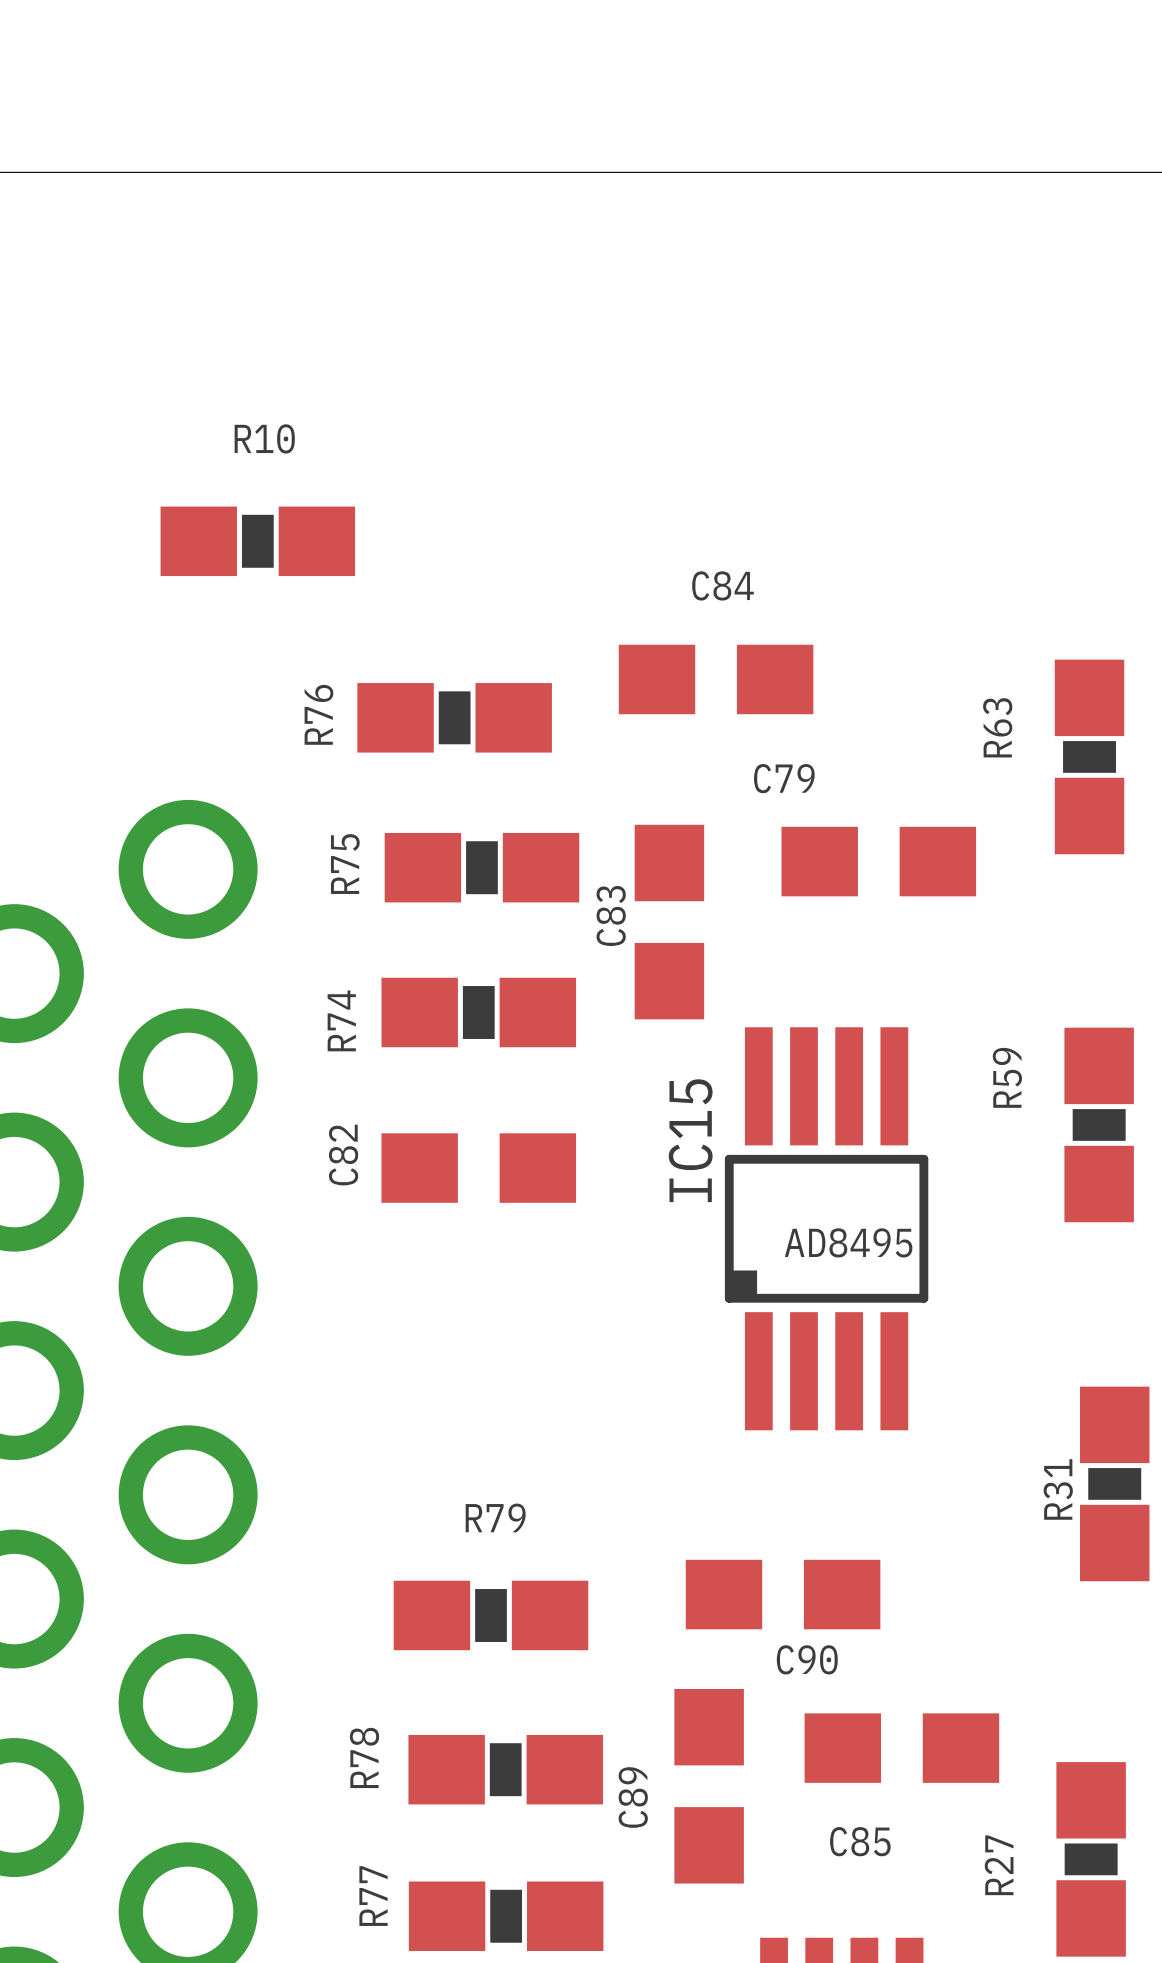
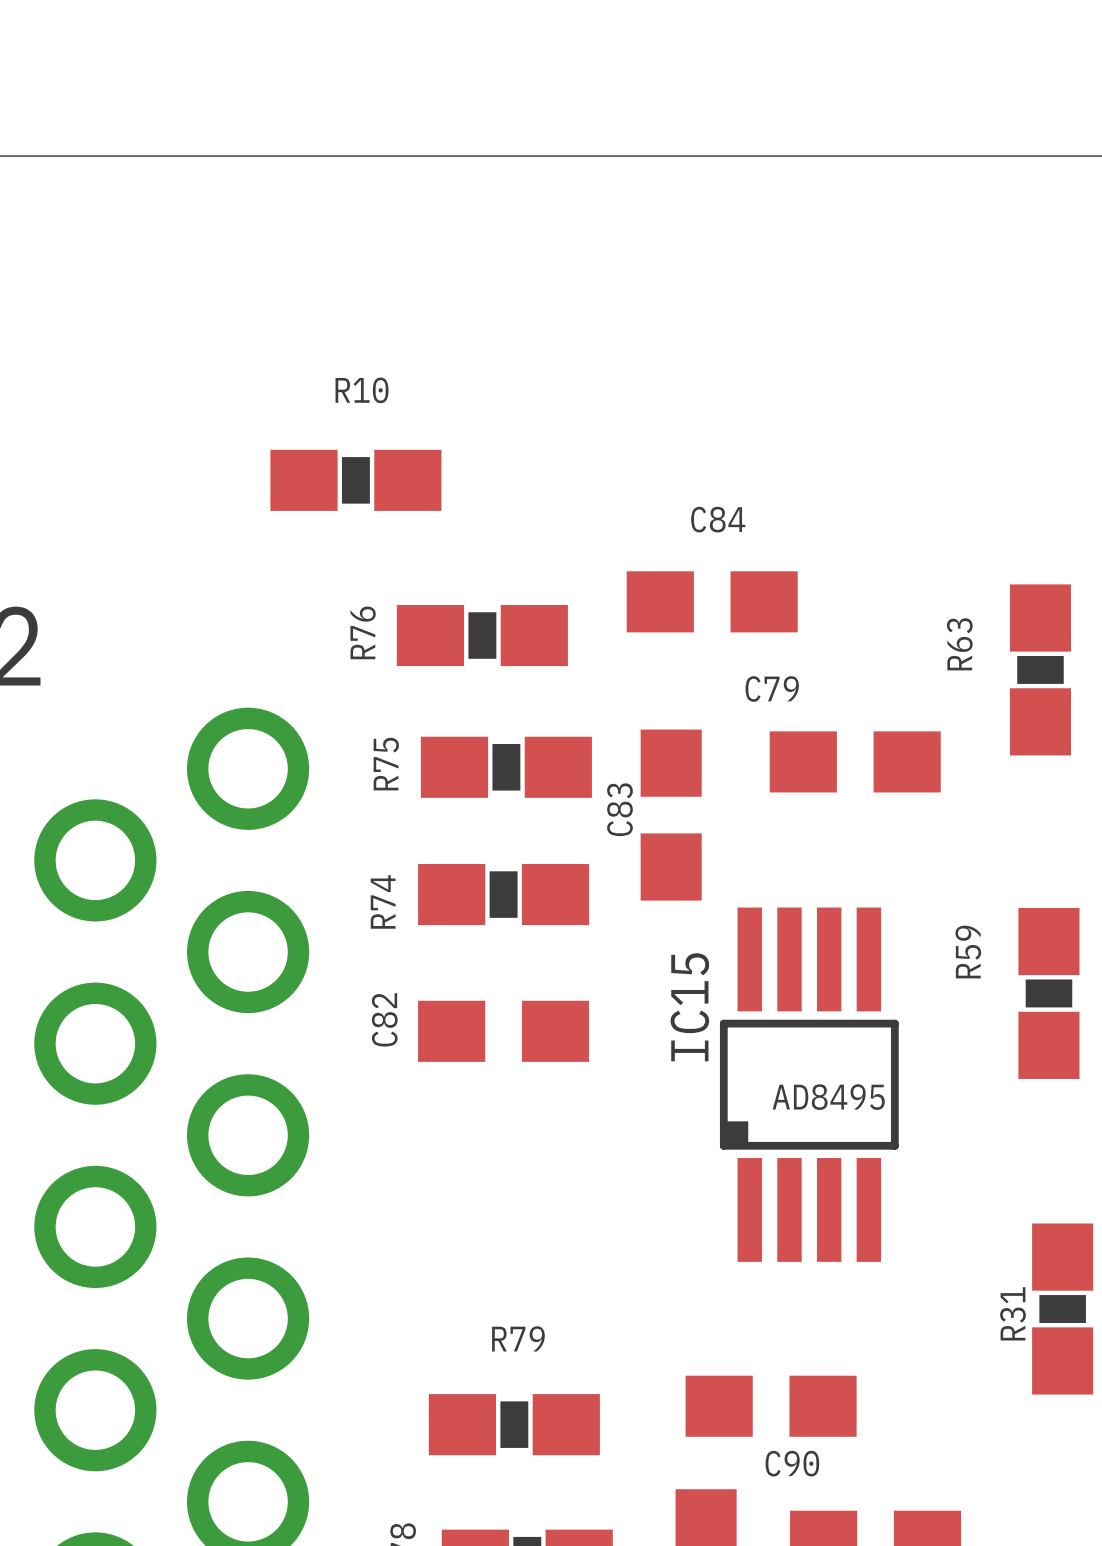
R10 position: (257, 541) -> (355, 480)

